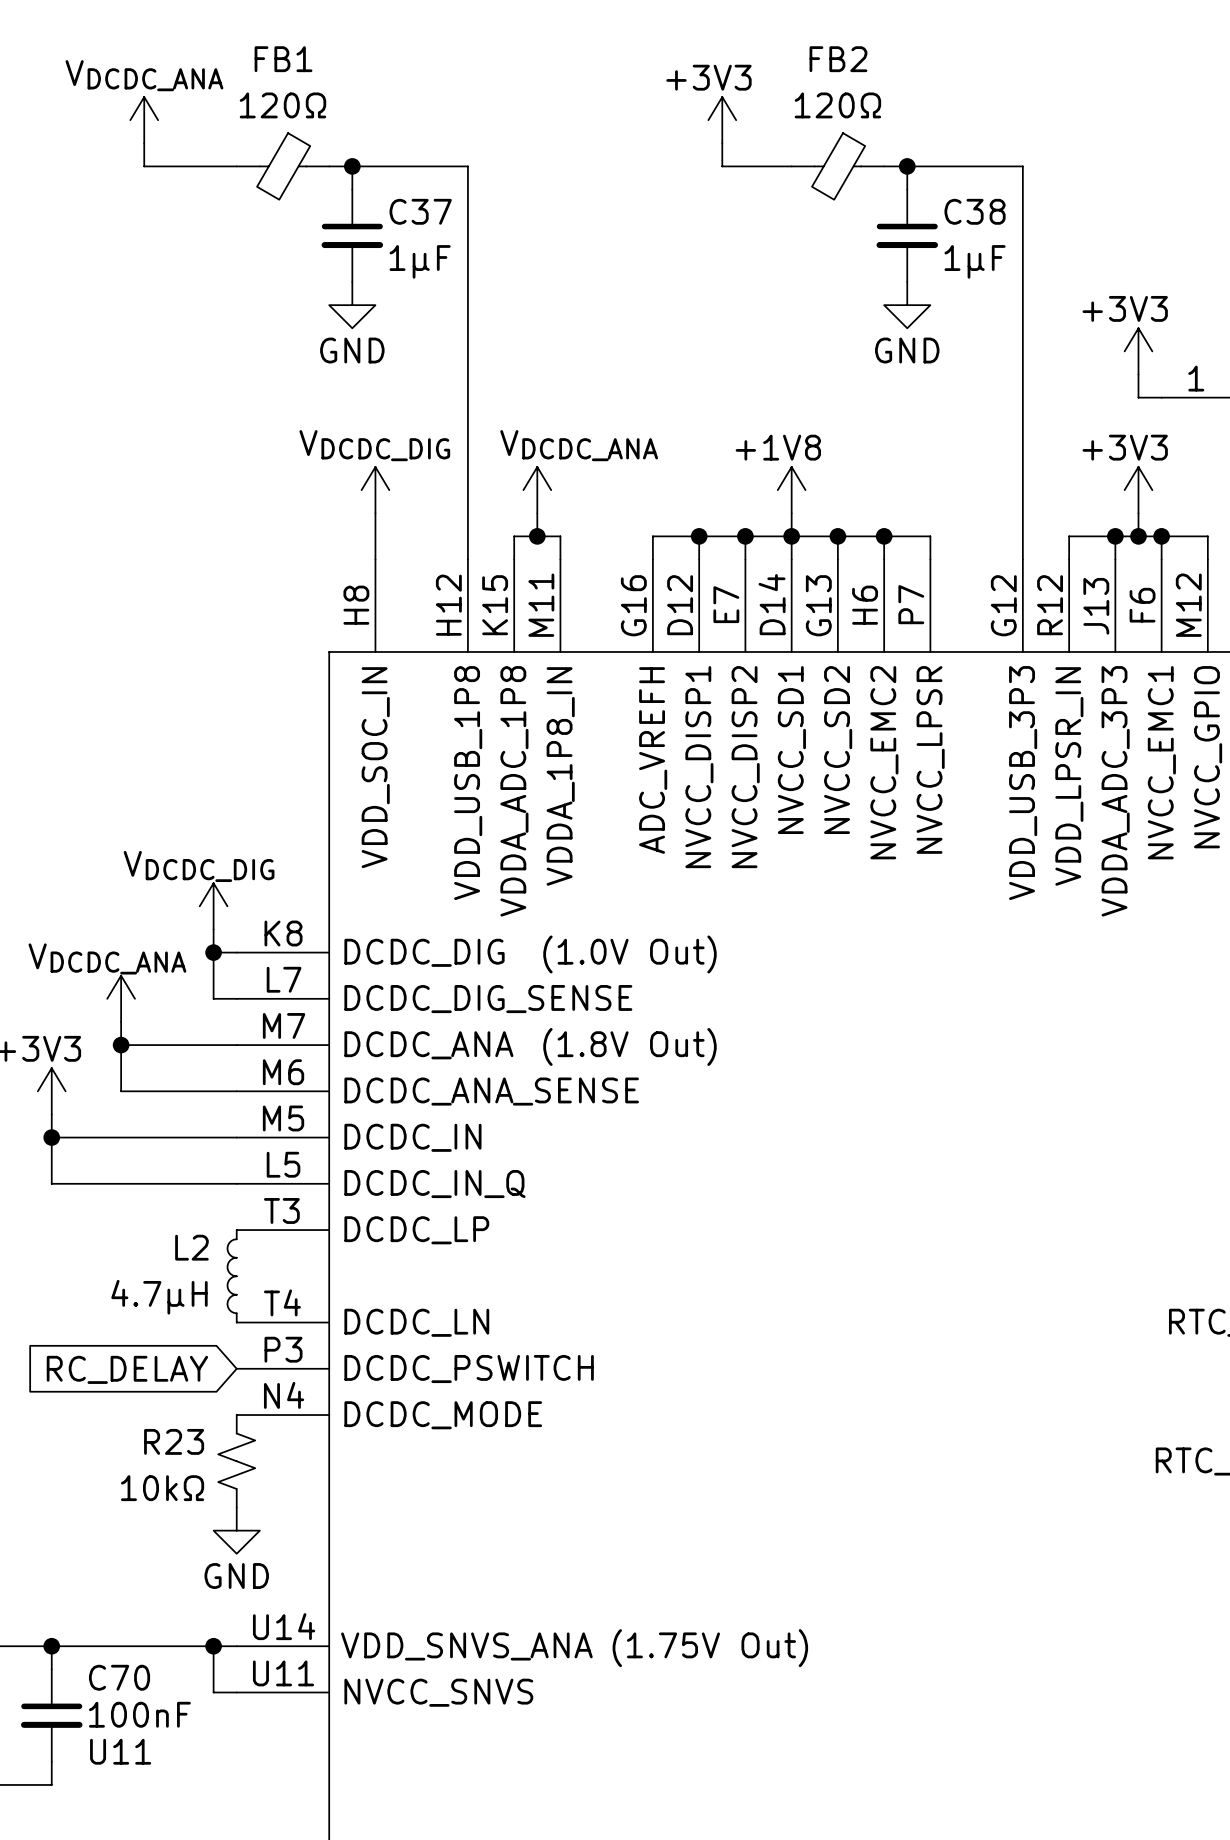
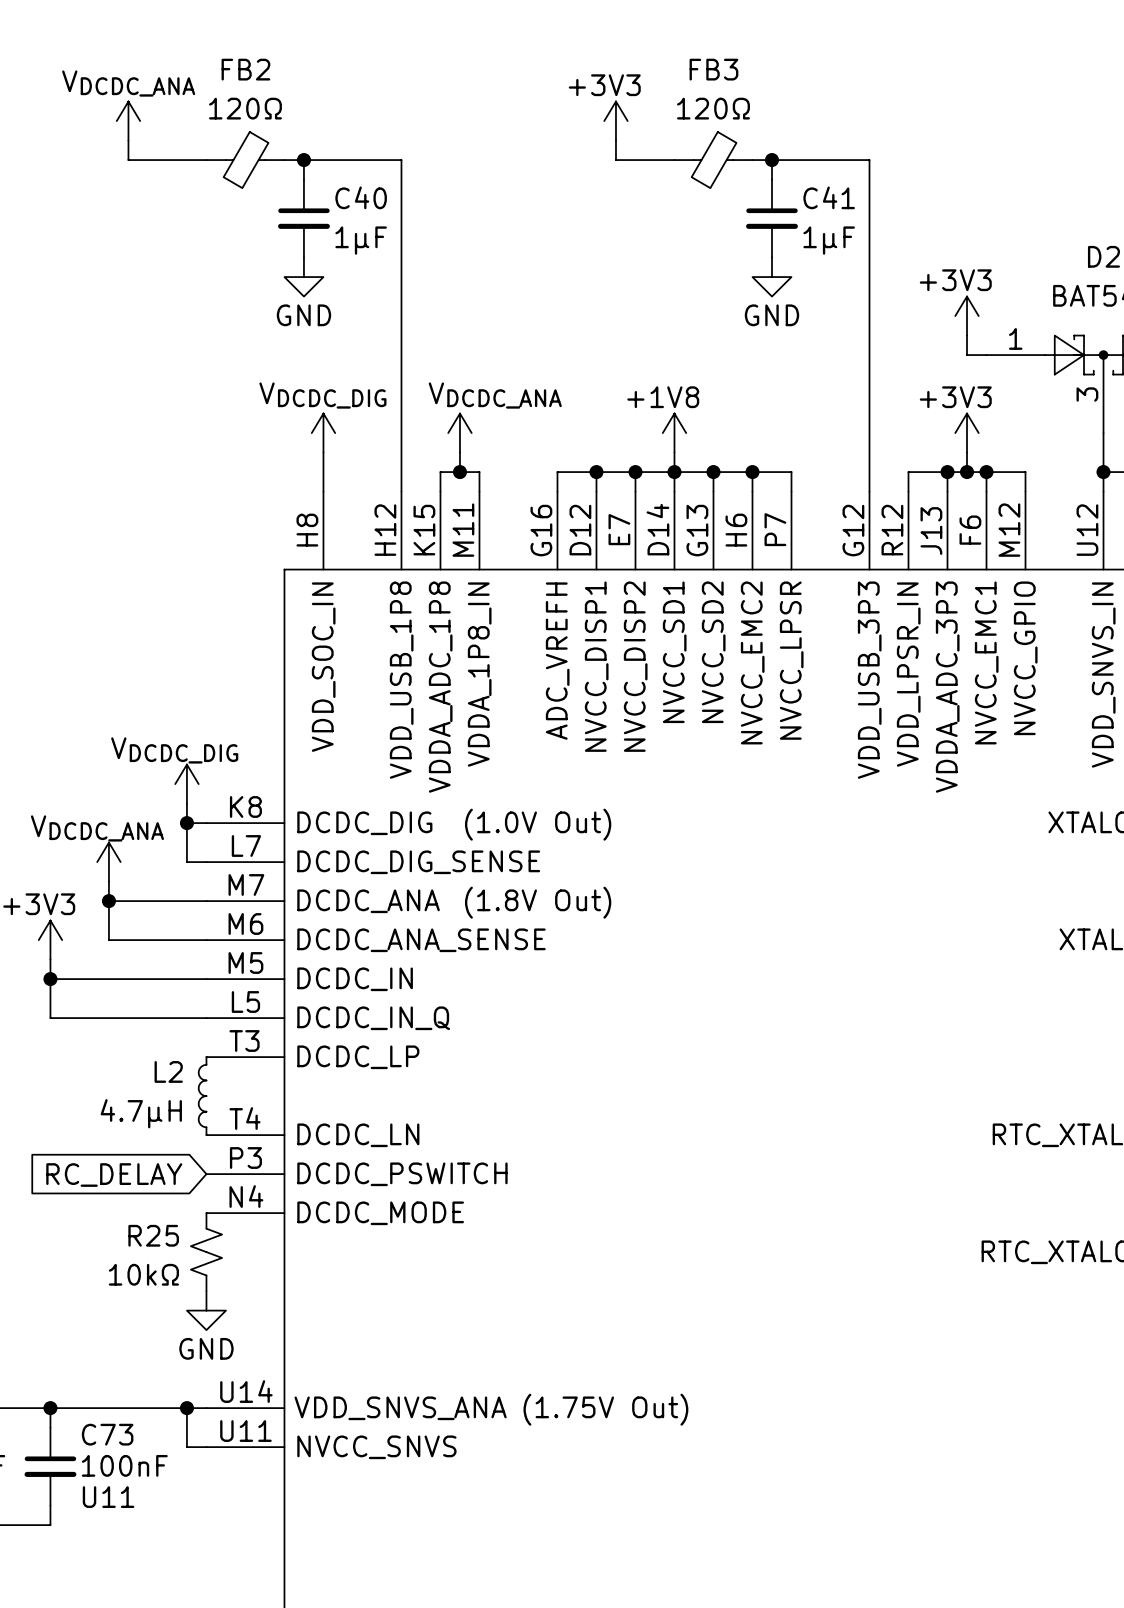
FB1 name: FB1 (283, 59) -> FB2 (245, 69)
FB2 name: FB2 (838, 59) -> FB3 (713, 69)
C37 name: C37 (420, 211) -> C40 (361, 197)
C38 name: C38 (975, 211) -> C41 (829, 197)
R23 name: R23 (174, 1441) -> R25 (153, 1235)
C70 name: C70 (119, 1677) -> C73 (107, 1434)

